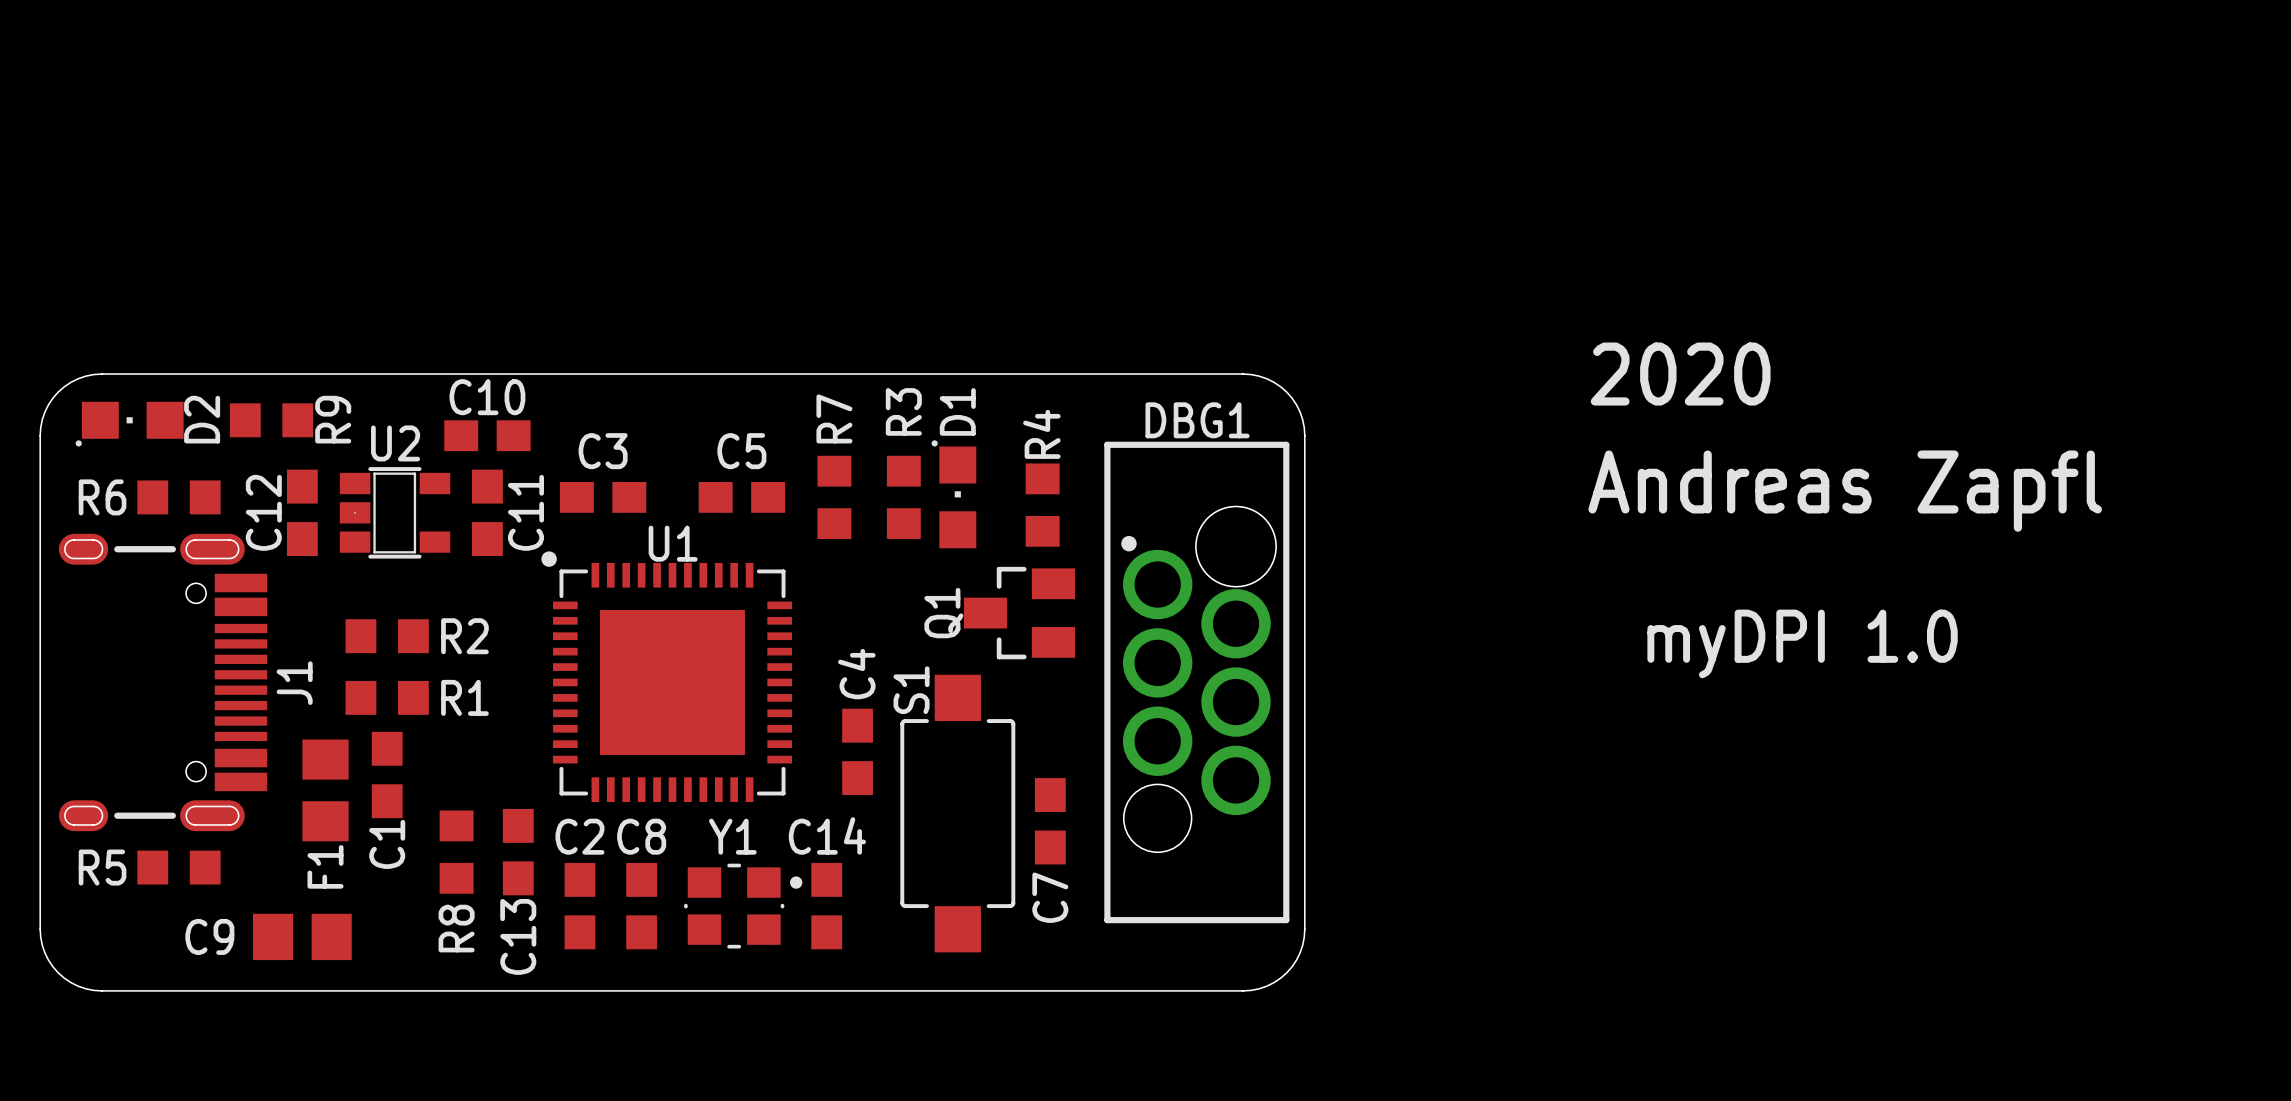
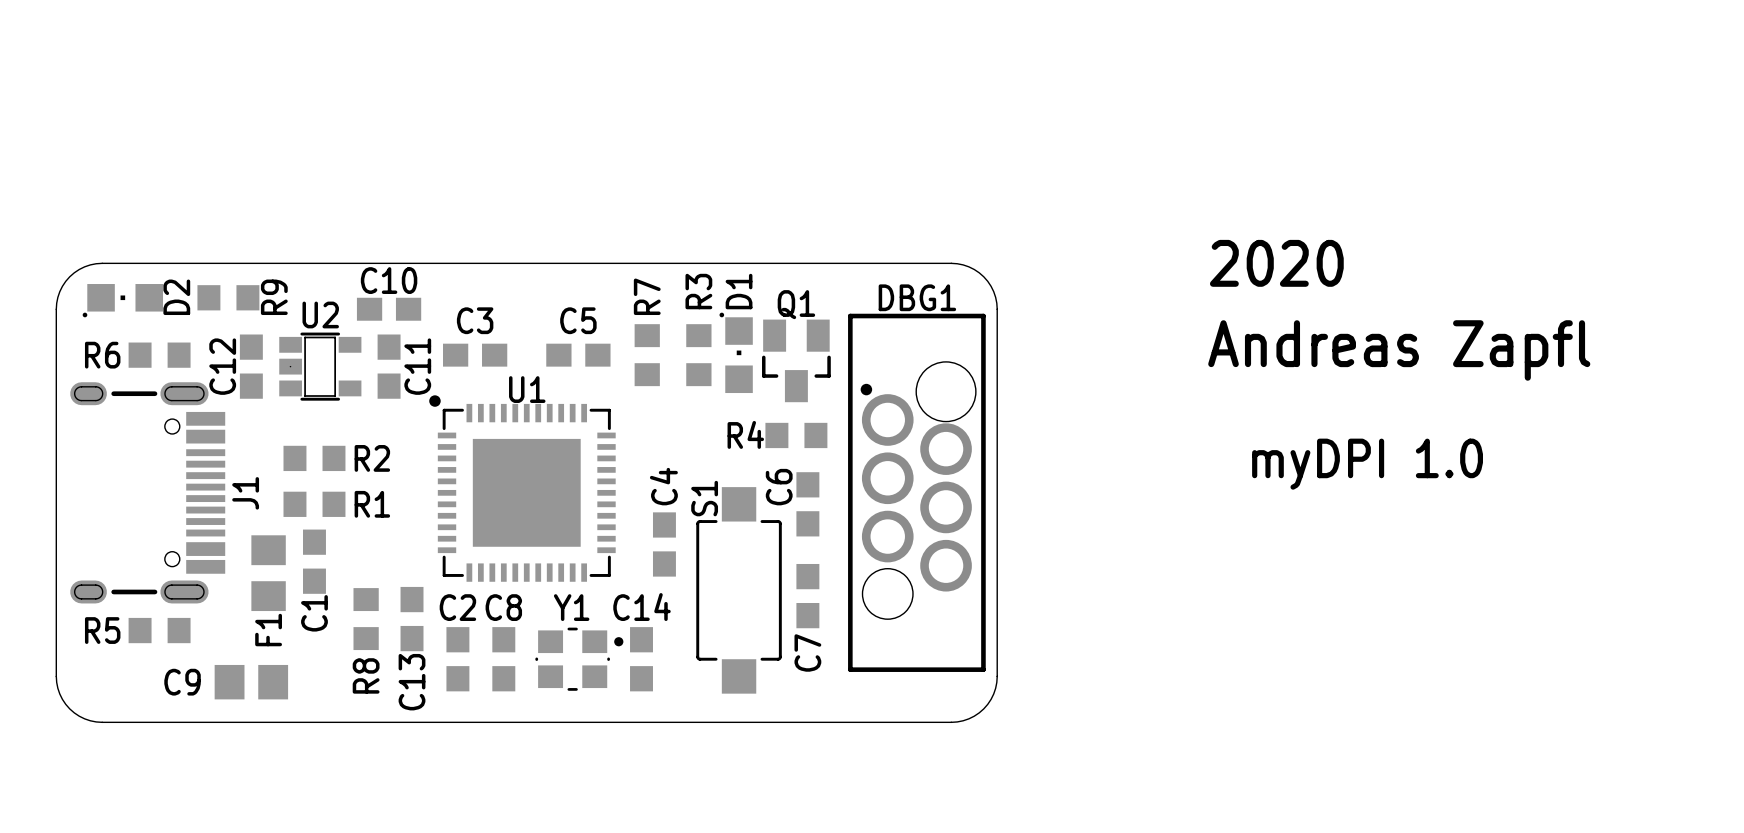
R4 name position: R4 (1041, 434) -> R4 (745, 434)
R4 rotation: 0° (1042, 505) -> 90° clockwise (796, 435)
R4 position: (1042, 505) -> (796, 435)
Q1 name position: Q1 (943, 613) -> Q1 (796, 304)
Q1 rotation: 0° (1019, 613) -> 90° counterclockwise (796, 360)
Q1 position: (1019, 613) -> (796, 360)
C6: none -> (807, 504)

